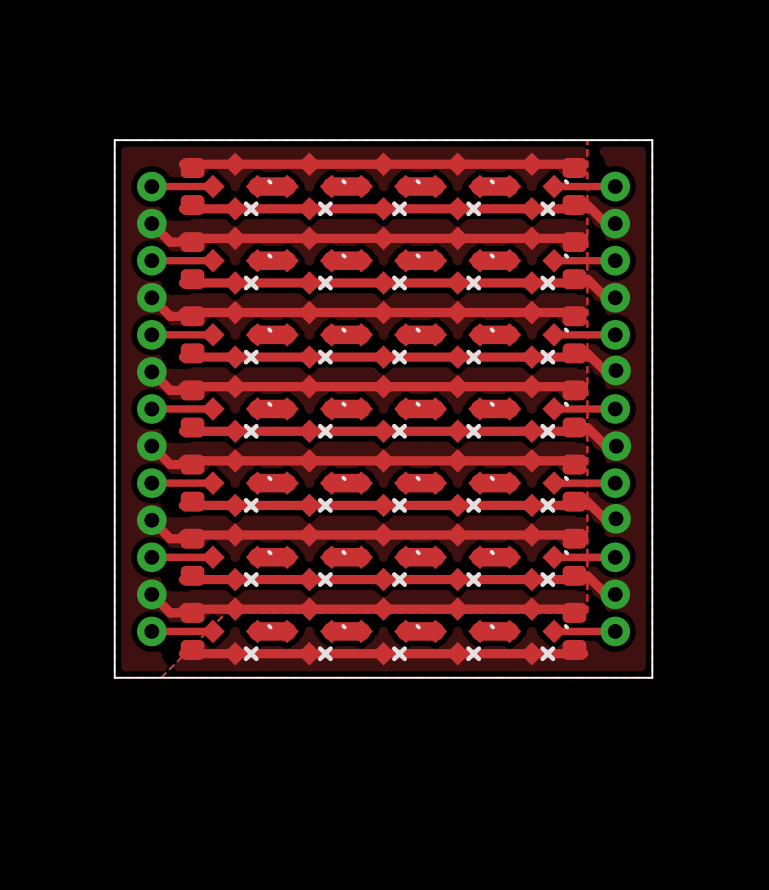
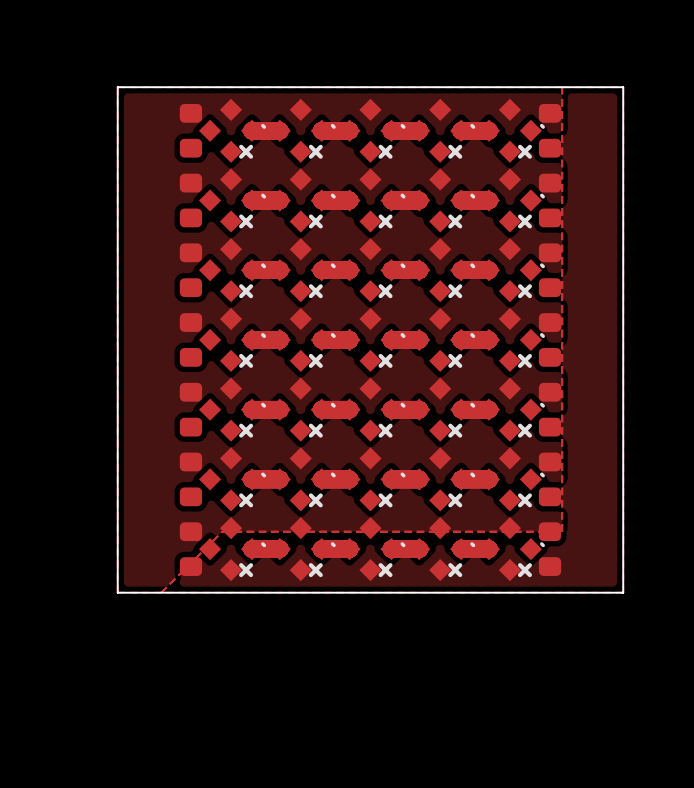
track: (183, 164) (583, 164) -> none
track: (145, 186) (212, 186) (151, 186) -> none
via: (151, 186) -> none
track: (615, 186) (554, 186) (621, 186) -> none
via: (615, 186) -> none
track: (587, 205) (605, 223) (615, 223) -> none
track: (183, 208) (583, 208) -> none
track: (151, 223) (170, 242) (179, 242) -> none
via: (151, 223) -> none
via: (615, 223) -> none
track: (183, 238) (583, 238) -> none
track: (145, 260) (212, 260) (151, 260) -> none
via: (151, 260) -> none
track: (615, 260) (554, 260) (621, 260) -> none
via: (615, 260) -> none
track: (587, 279) (605, 297) (615, 297) -> none
track: (183, 282) (583, 282) -> none
track: (151, 297) (170, 316) (179, 316) -> none
via: (151, 297) -> none
via: (615, 297) -> none
track: (183, 312) (583, 312) -> none
track: (145, 334) (212, 334) (151, 334) -> none
via: (151, 334) -> none
track: (615, 334) (554, 334) (621, 334) -> none
via: (615, 334) -> none
track: (587, 353) (604, 370) (615, 370) -> none
track: (183, 357) (583, 357) -> none
via: (615, 370) -> none
track: (151, 371) (170, 390) (179, 390) -> none
via: (151, 371) -> none
track: (183, 386) (583, 386) -> none
track: (145, 408) (212, 408) (151, 408) -> none
via: (151, 408) -> none
track: (615, 408) (554, 408) (621, 408) -> none
via: (615, 408) -> none
track: (587, 427) (606, 446) (616, 446) -> none
track: (183, 431) (583, 431) -> none
track: (151, 446) (170, 464) (179, 464) -> none
via: (151, 446) -> none
via: (616, 446) -> none
track: (183, 460) (583, 460) -> none
track: (145, 483) (212, 483) (151, 483) -> none
via: (151, 483) -> none
track: (615, 483) (554, 483) (621, 483) -> none
via: (615, 483) -> none
track: (587, 501) (604, 518) (615, 518) -> none
track: (183, 505) (583, 505) -> none
via: (615, 518) -> none
track: (151, 520) (170, 538) (179, 538) -> none
via: (151, 520) -> none
track: (183, 534) (583, 534) -> none
track: (145, 557) (212, 557) (151, 557) -> none
via: (151, 557) -> none
track: (615, 557) (554, 557) (621, 557) -> none
via: (615, 557) -> none
track: (587, 575) (605, 594) (615, 594) -> none
track: (183, 579) (583, 579) -> none
track: (151, 594) (170, 612) (179, 612) -> none
via: (151, 594) -> none
via: (615, 594) -> none
track: (183, 609) (583, 609) -> none
track: (145, 631) (212, 631) (151, 631) -> none
via: (151, 631) -> none
track: (615, 631) (554, 631) (621, 631) -> none
via: (615, 631) -> none
track: (183, 653) (583, 653) -> none

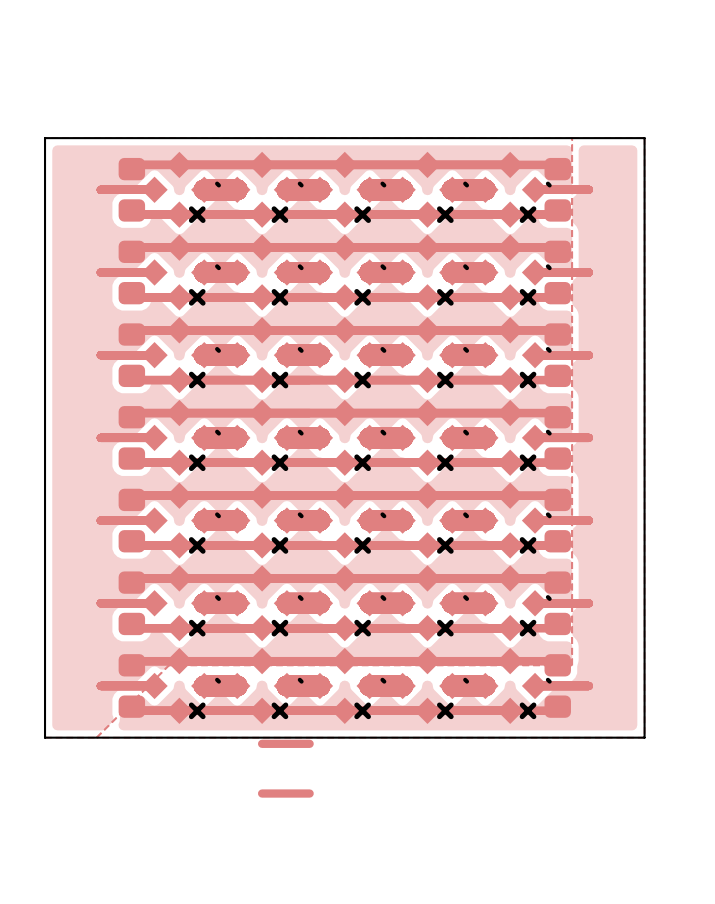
track: none -> (131, 164) (557, 164)
track: none -> (100, 189) (154, 189)
track: none -> (535, 189) (588, 189)
track: none -> (131, 214) (557, 214)
track: none -> (131, 247) (557, 247)
track: none -> (100, 272) (154, 272)
track: none -> (535, 272) (588, 272)
track: none -> (131, 297) (557, 297)
track: none -> (131, 330) (557, 330)
track: none -> (100, 355) (154, 355)
track: none -> (535, 355) (588, 355)
track: none -> (131, 380) (557, 380)
track: none -> (131, 413) (557, 413)
track: none -> (100, 437) (154, 437)
track: none -> (535, 437) (588, 437)
track: none -> (131, 462) (557, 462)
track: none -> (131, 495) (557, 495)
track: none -> (100, 520) (154, 520)
track: none -> (535, 520) (588, 520)
track: none -> (131, 545) (557, 545)
track: none -> (131, 578) (557, 578)
track: none -> (100, 603) (154, 603)
track: none -> (535, 603) (588, 603)
track: none -> (131, 628) (557, 628)
track: none -> (131, 661) (557, 661)
track: none -> (100, 685) (154, 685)
track: none -> (535, 685) (588, 685)
track: none -> (131, 710) (557, 710)
track: none -> (262, 743) (309, 743)
track: none -> (262, 793) (309, 793)

